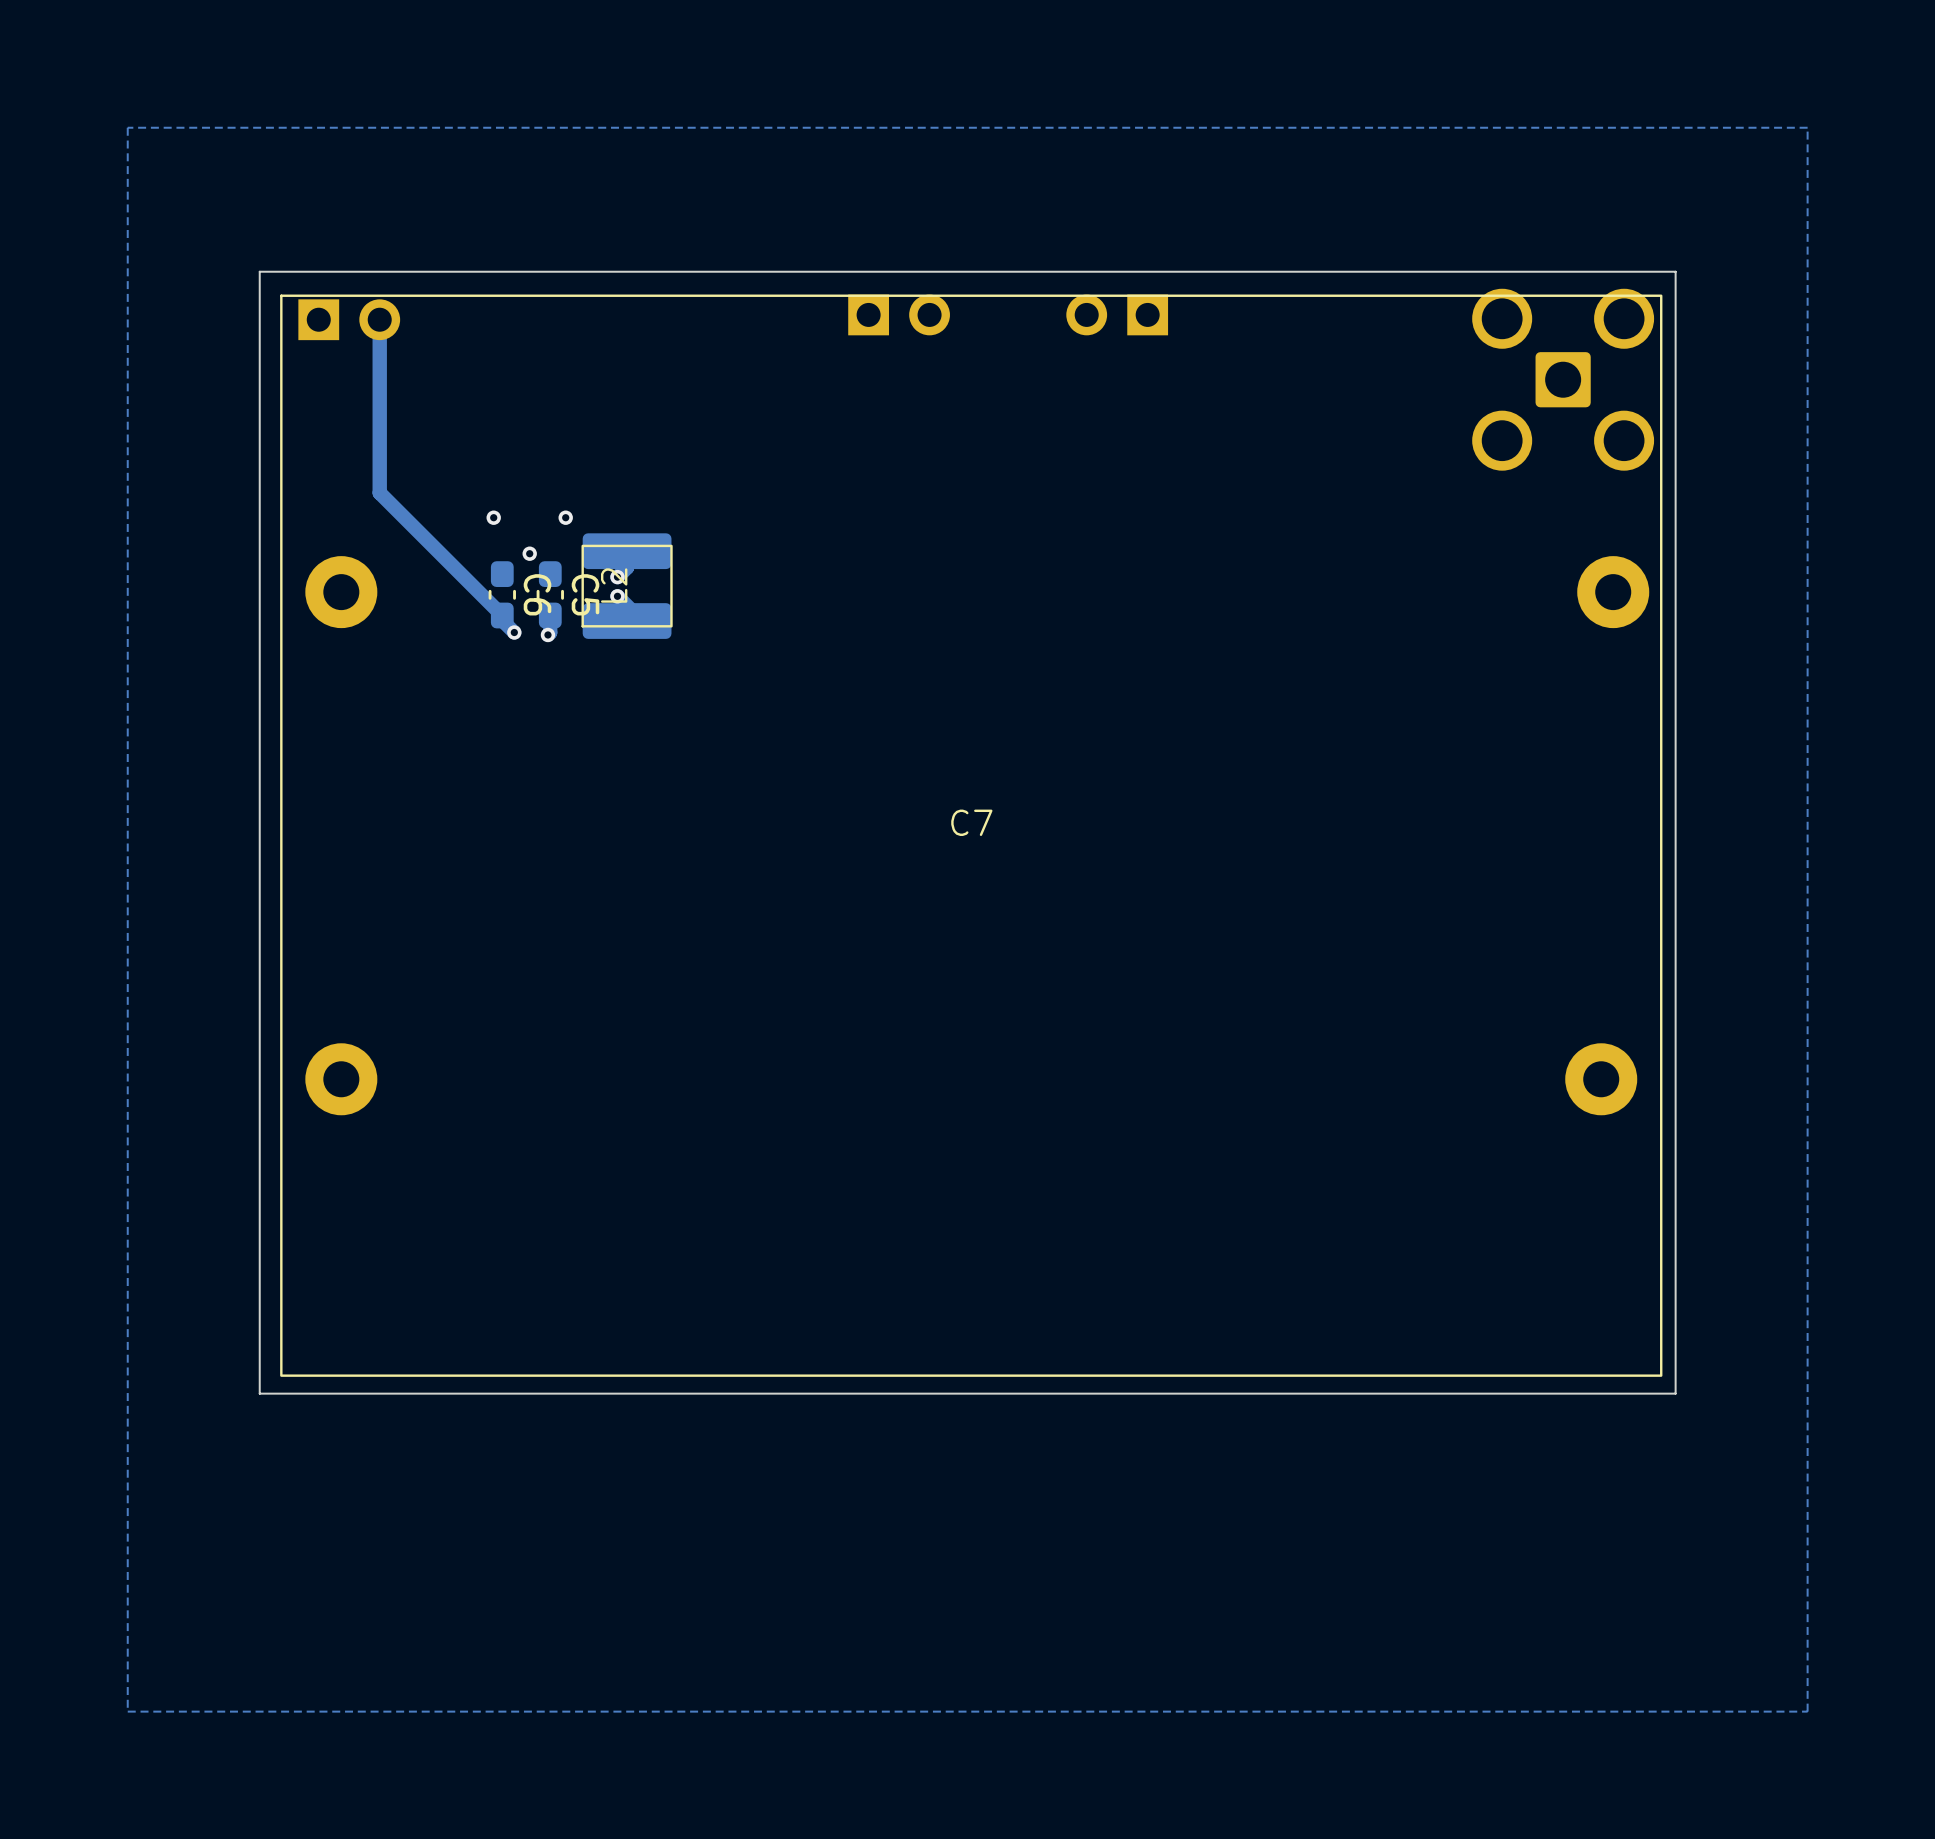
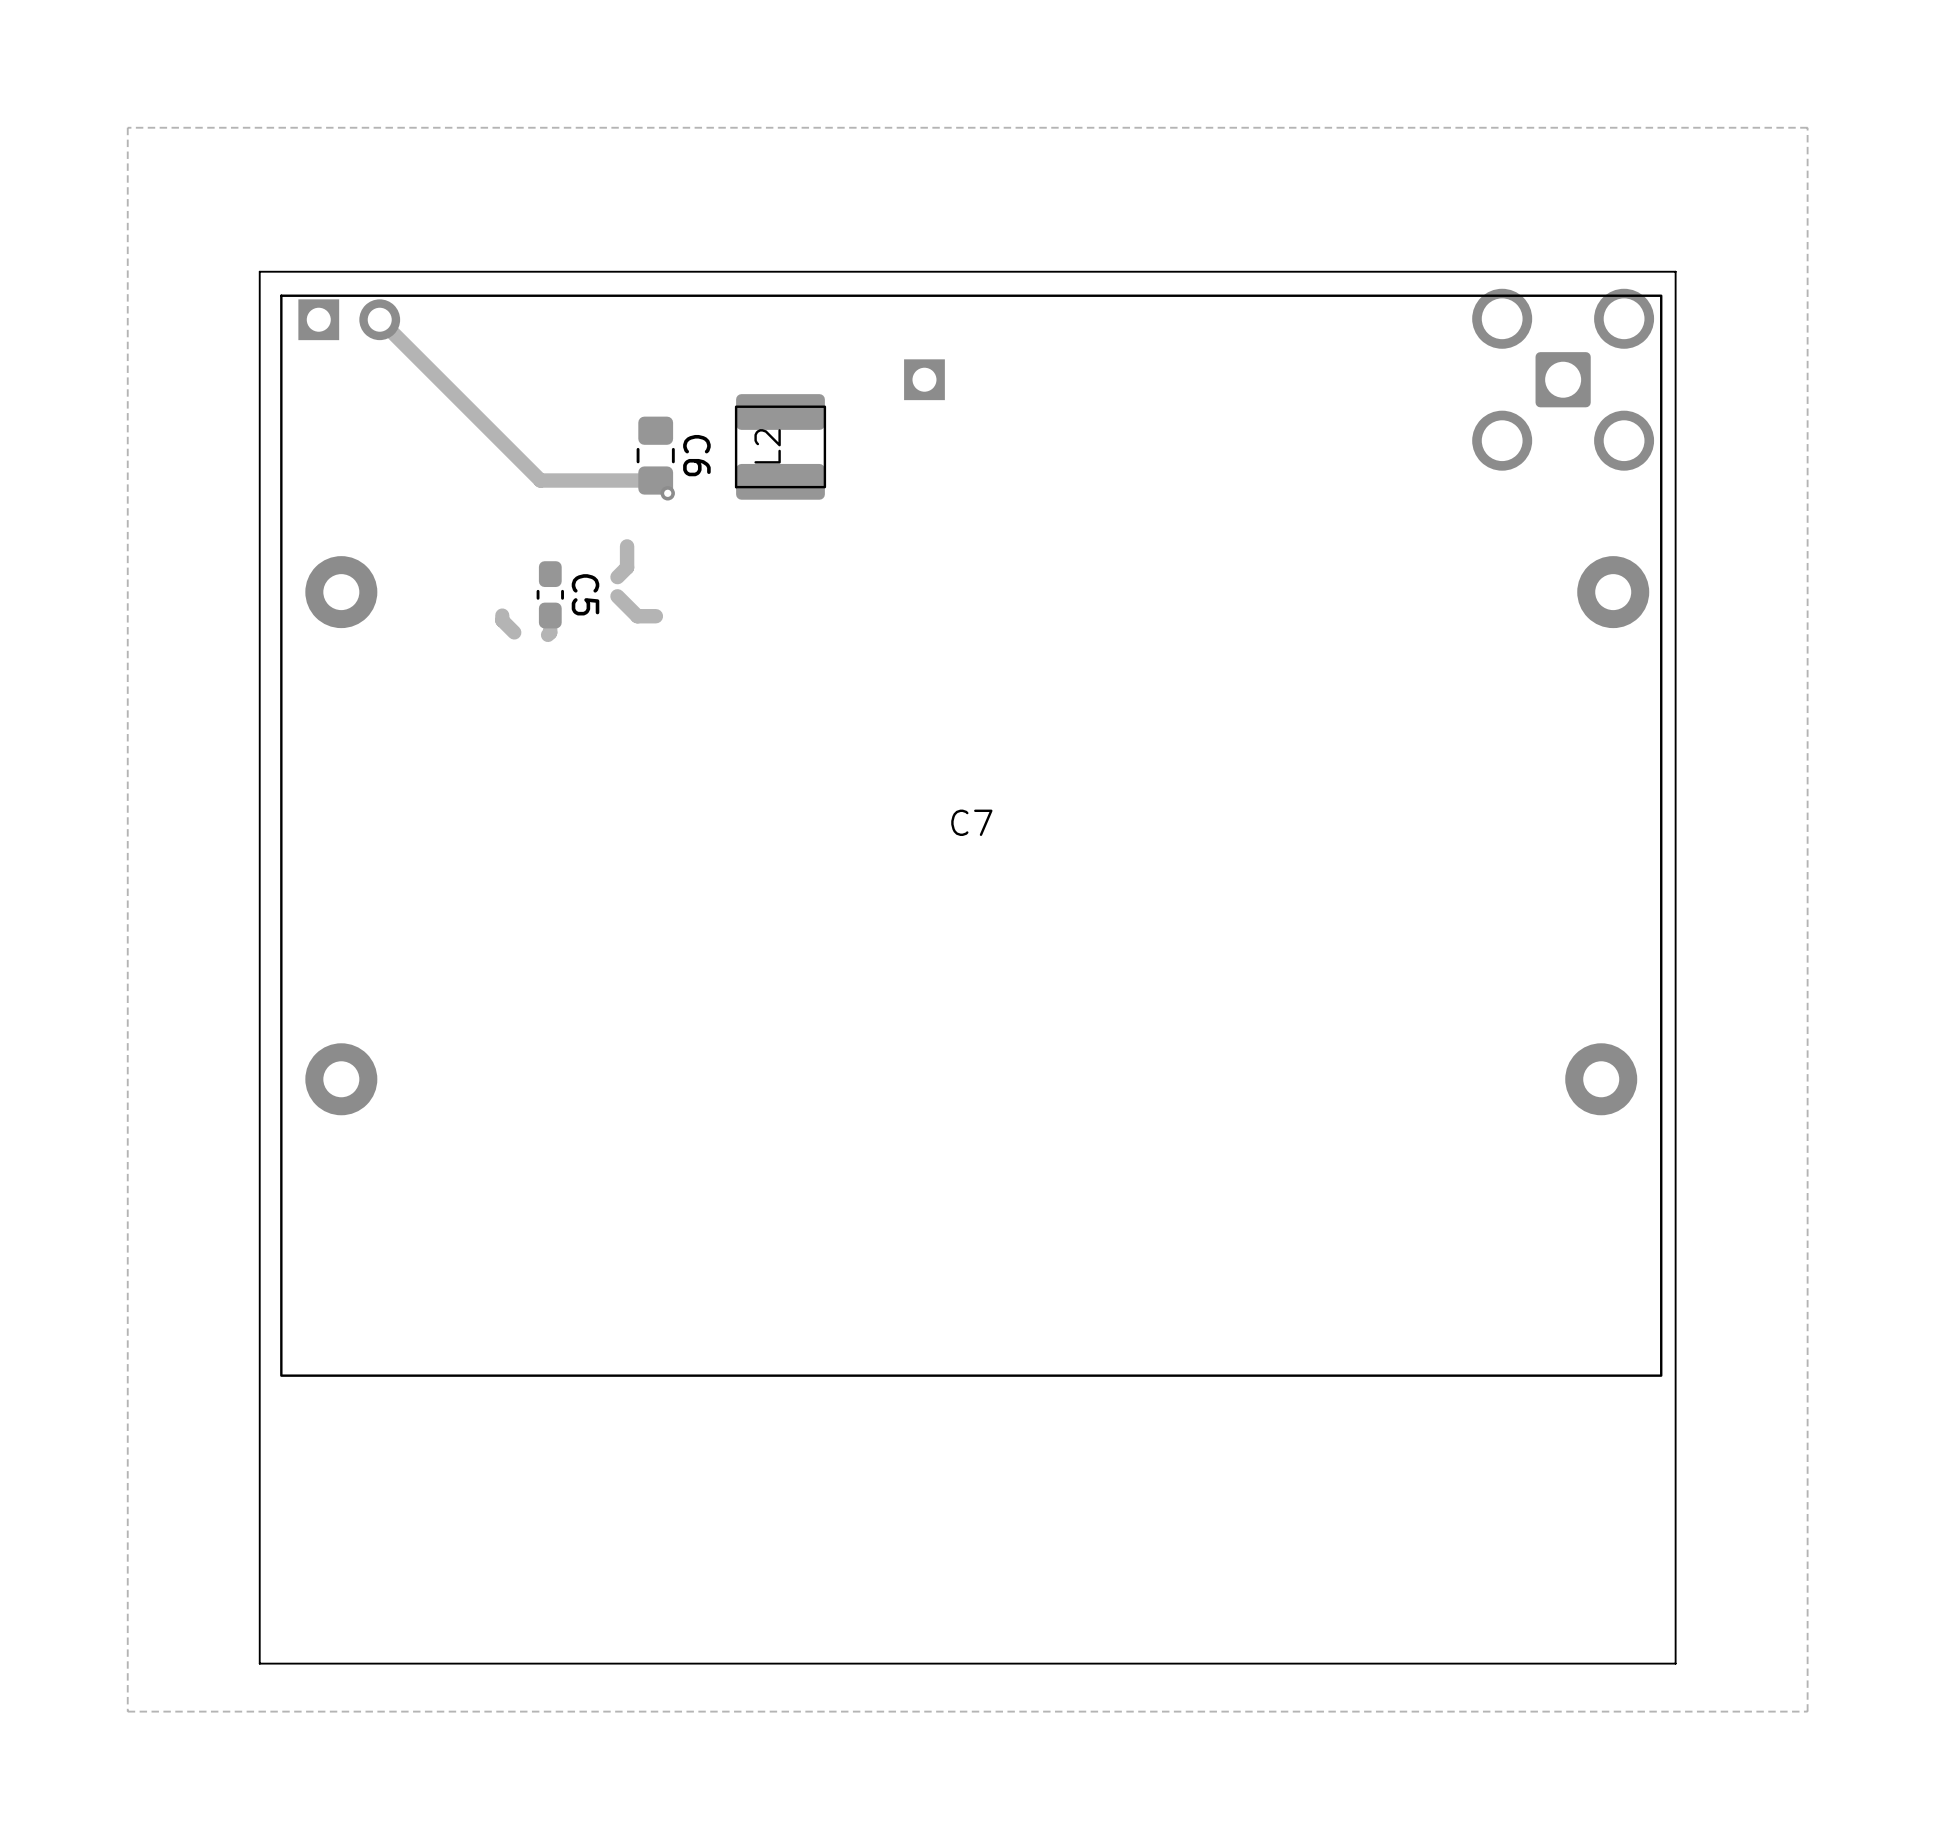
part: (899, 314) -> none
part: (1117, 314) -> none
track: (379, 319) (379, 492) (502, 615) (502, 619) -> (379, 319) (540, 480) (655, 480) (667, 493)
part: none -> (924, 379)
via: none -> (667, 493)
via: (493, 517) -> none
via: (565, 517) -> none
via: (529, 553) -> none
C6 footprint: [488, 561, 516, 629] -> [636, 416, 675, 495]
via: (617, 577) -> none
L2 position: (627, 586) -> (780, 446)
via: (617, 596) -> none
via: (514, 632) -> none
via: (547, 634) -> none
board edge: (1675, 1393) (259, 1393) -> (1675, 1393) (1675, 1663) (259, 1663) (259, 1393)

